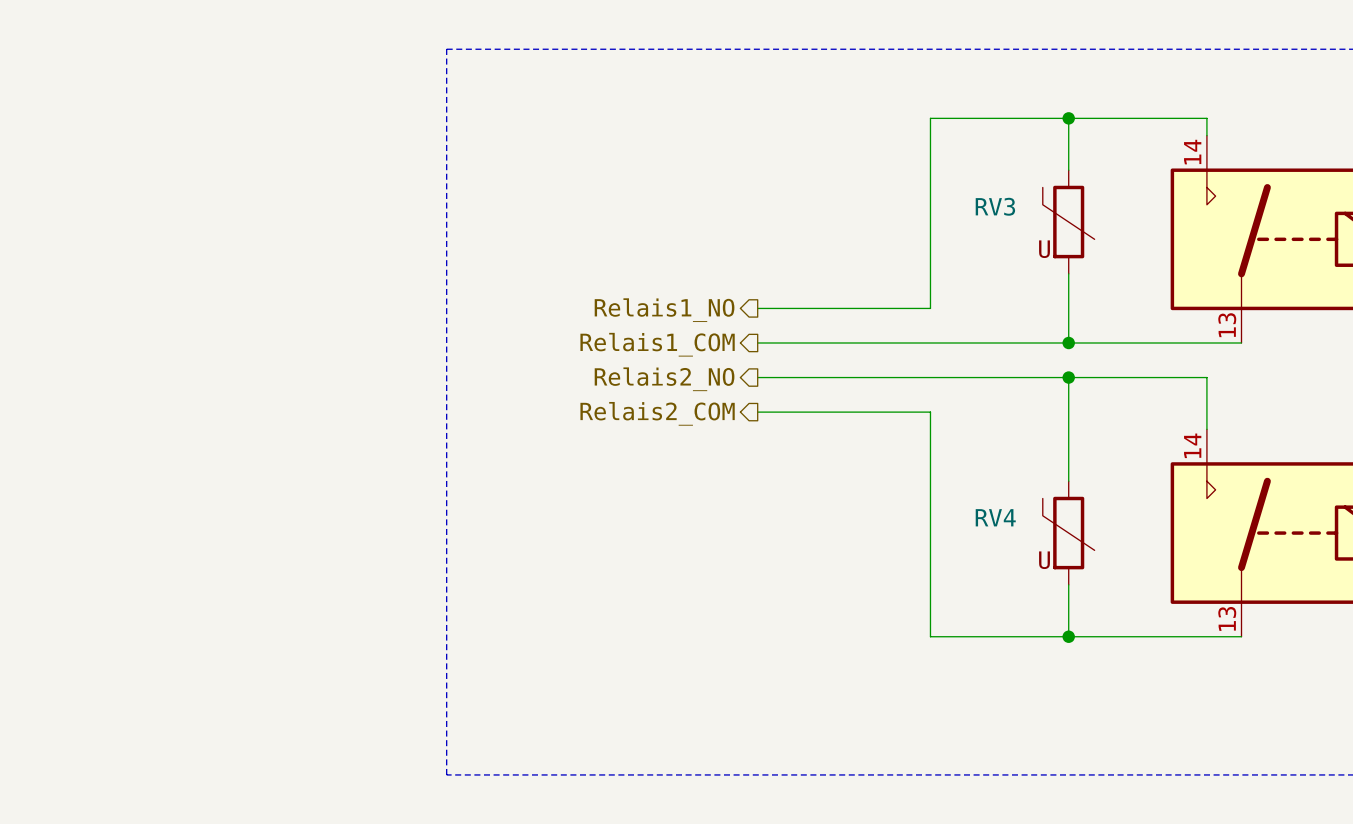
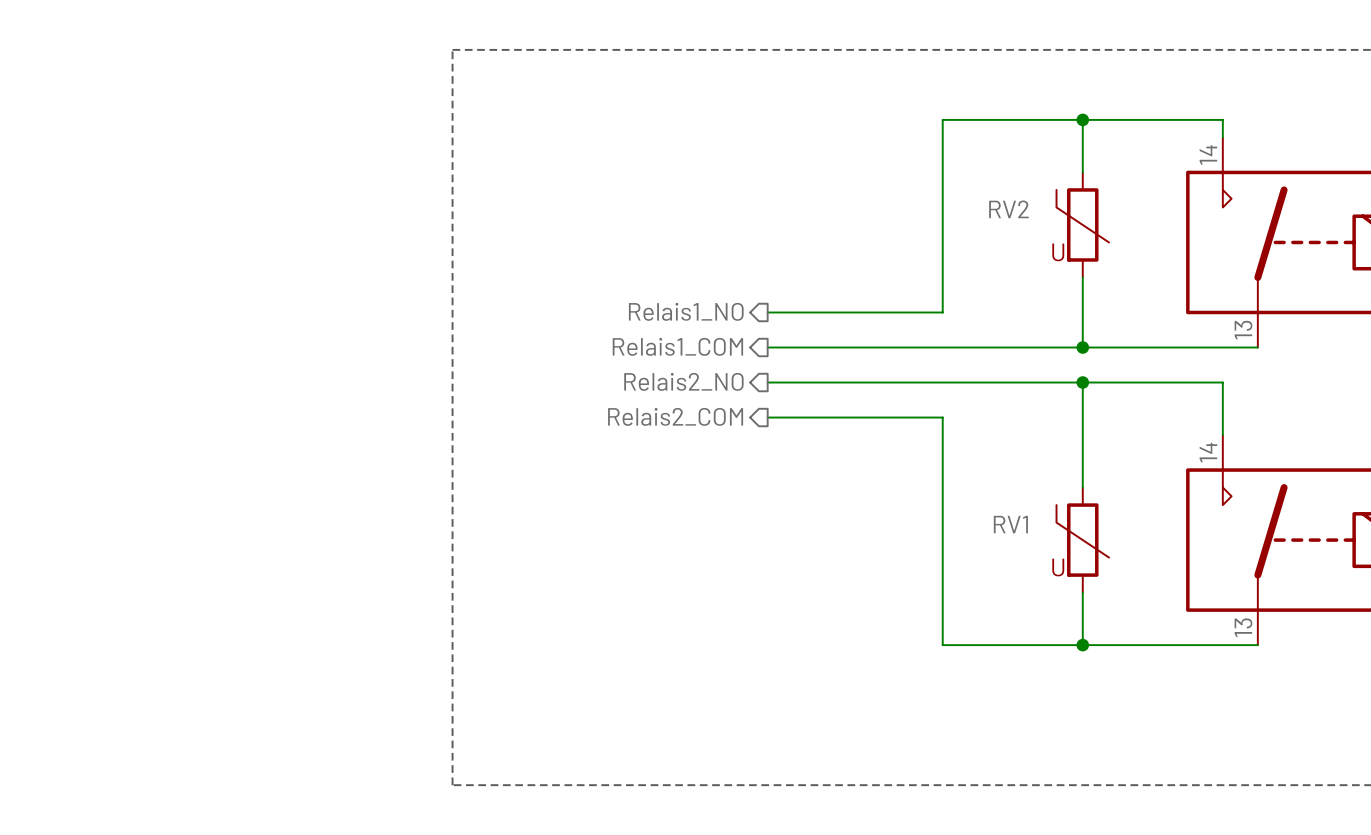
RV3 name: RV3 (995, 206) -> RV2 (1008, 209)
RV4 name: RV4 (995, 517) -> RV1 (1010, 524)

